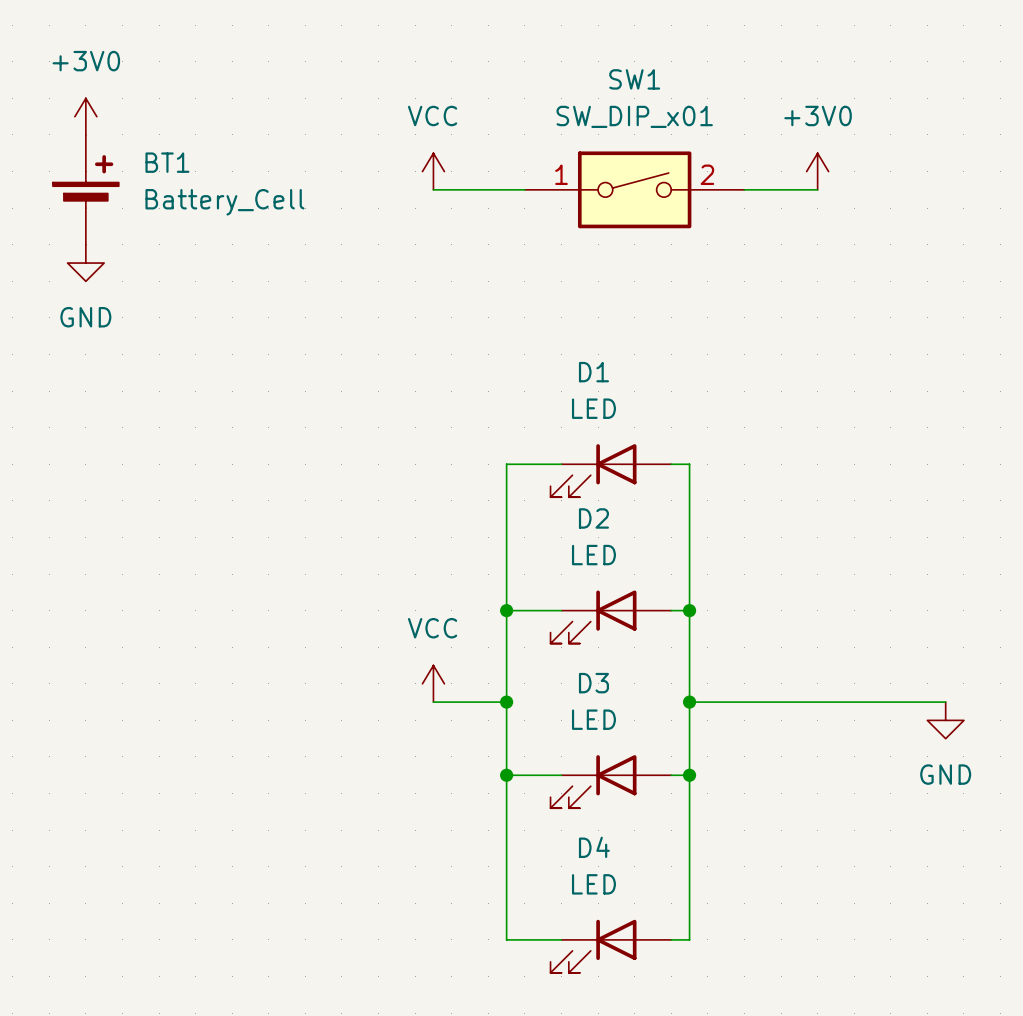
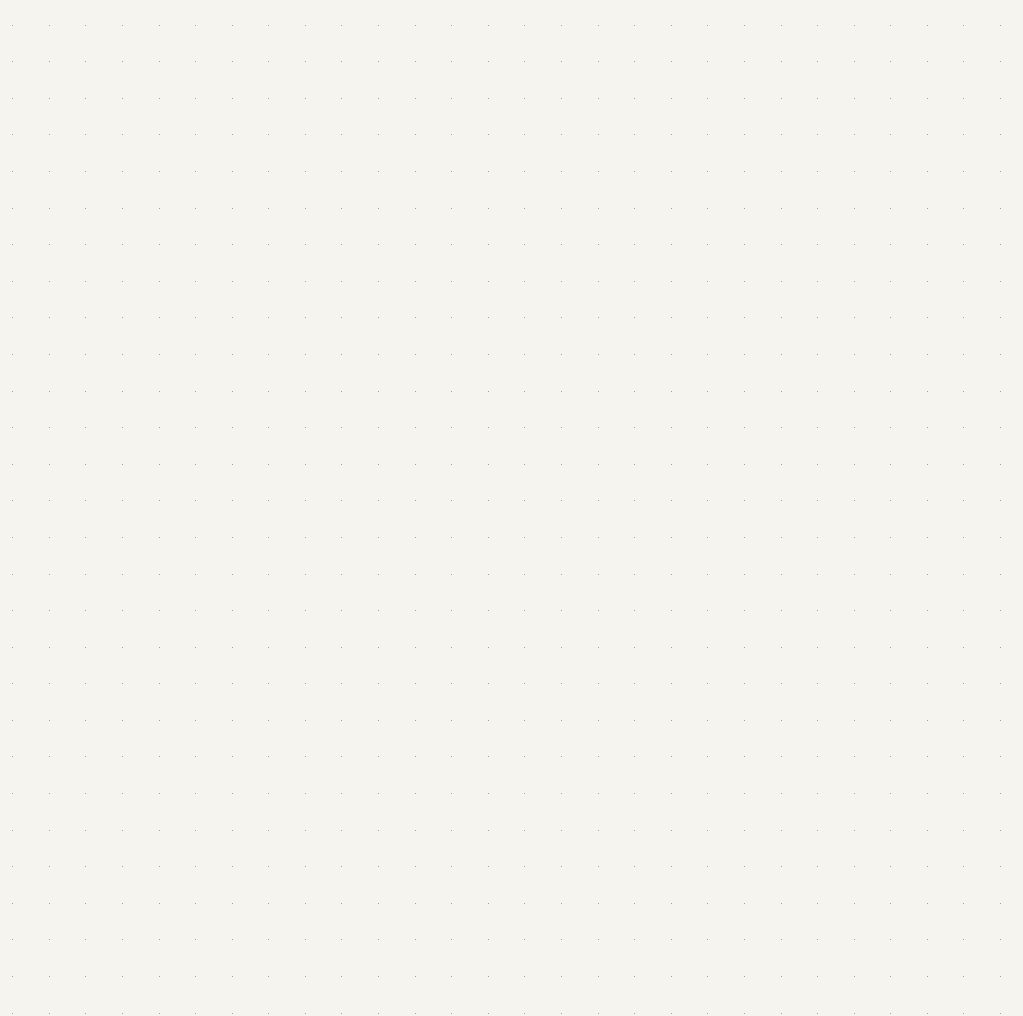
power symbol: +3V0 (85, 116) -> none
power symbol: VCC (433, 171) -> none
power symbol: +3V0 (817, 171) -> none
BT1: Battery_Cell (85, 189) -> none
wire: (433, 189) (524, 189) -> none
SW1: SW_DIP_x01 (634, 189) -> none
wire: (744, 189) (817, 189) -> none
power symbol: GND (85, 263) -> none
wire: (561, 464) (506, 464) (506, 939) (561, 939) -> none
wire: (671, 464) (689, 464) (689, 939) (671, 939) -> none
D1: LED (610, 470) -> none
wire: (506, 610) (561, 610) -> none
junction: (506, 610) -> none
wire: (671, 610) (689, 610) -> none
junction: (689, 610) -> none
D2: LED (610, 617) -> none
power symbol: VCC (433, 683) -> none
wire: (433, 702) (506, 702) -> none
junction: (506, 702) -> none
wire: (689, 702) (945, 702) -> none
junction: (689, 702) -> none
power symbol: GND (945, 720) -> none
wire: (506, 775) (561, 775) -> none
junction: (506, 775) -> none
wire: (671, 775) (689, 775) -> none
junction: (689, 775) -> none
D3: LED (610, 781) -> none
D4: LED (610, 946) -> none

